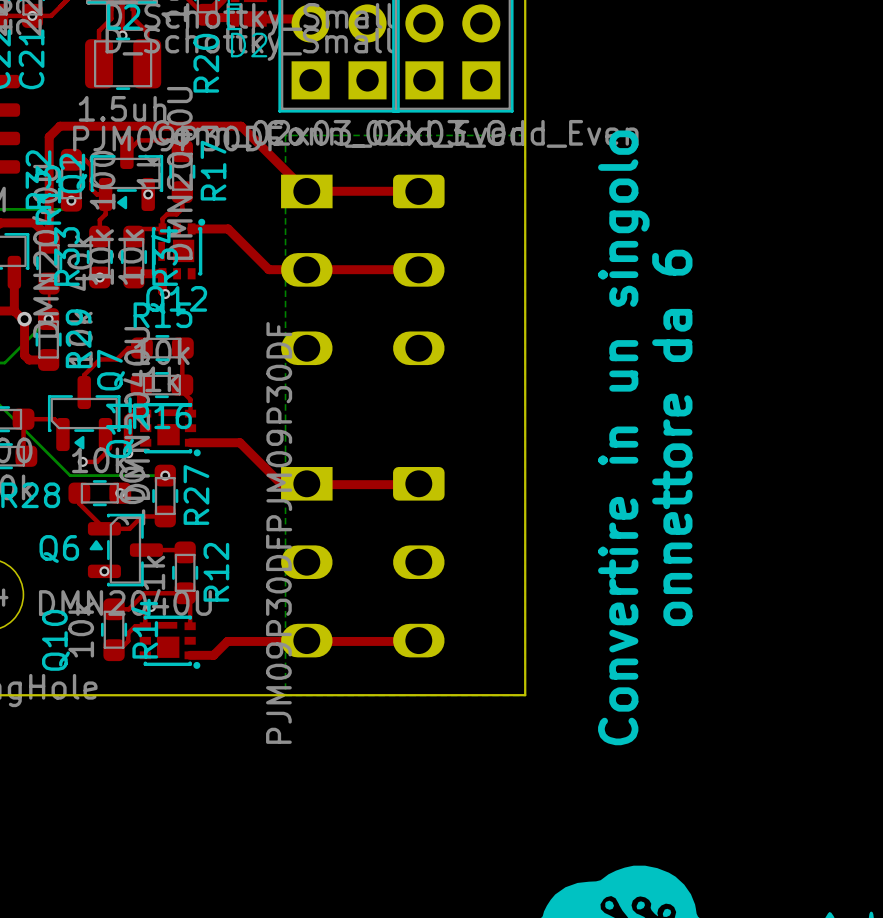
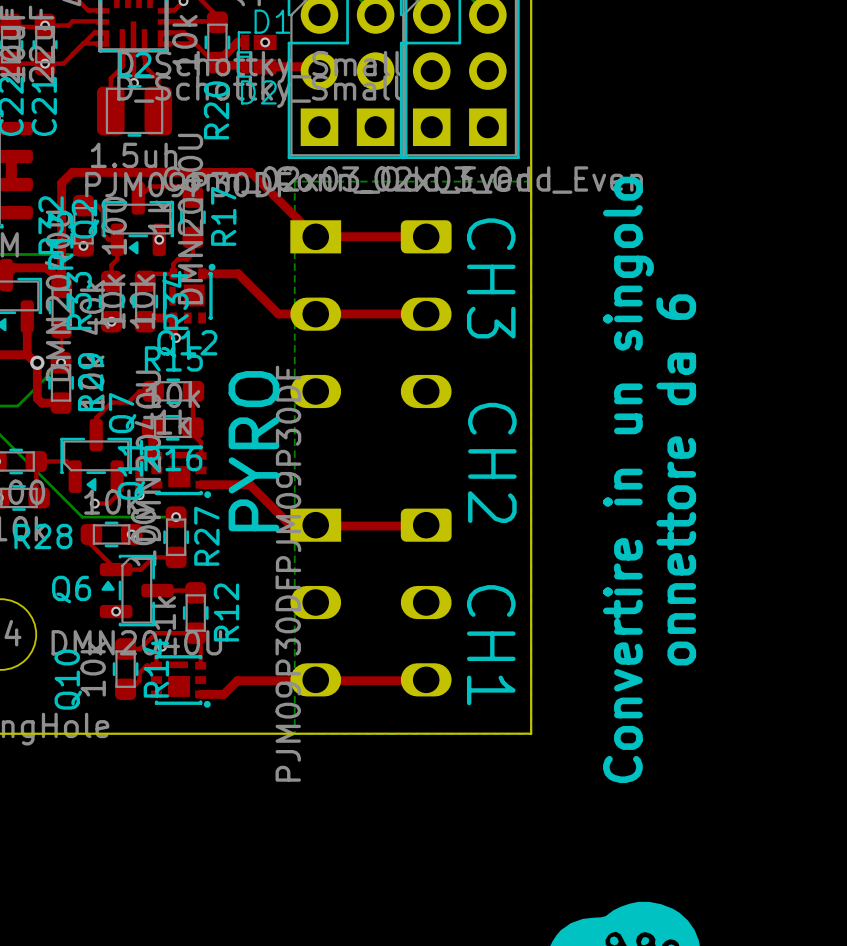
text: none -> CH3 (491, 278)
text: none -> PYRO (253, 451)
text: none -> CH2 (492, 462)
text: none -> CH1 (491, 645)

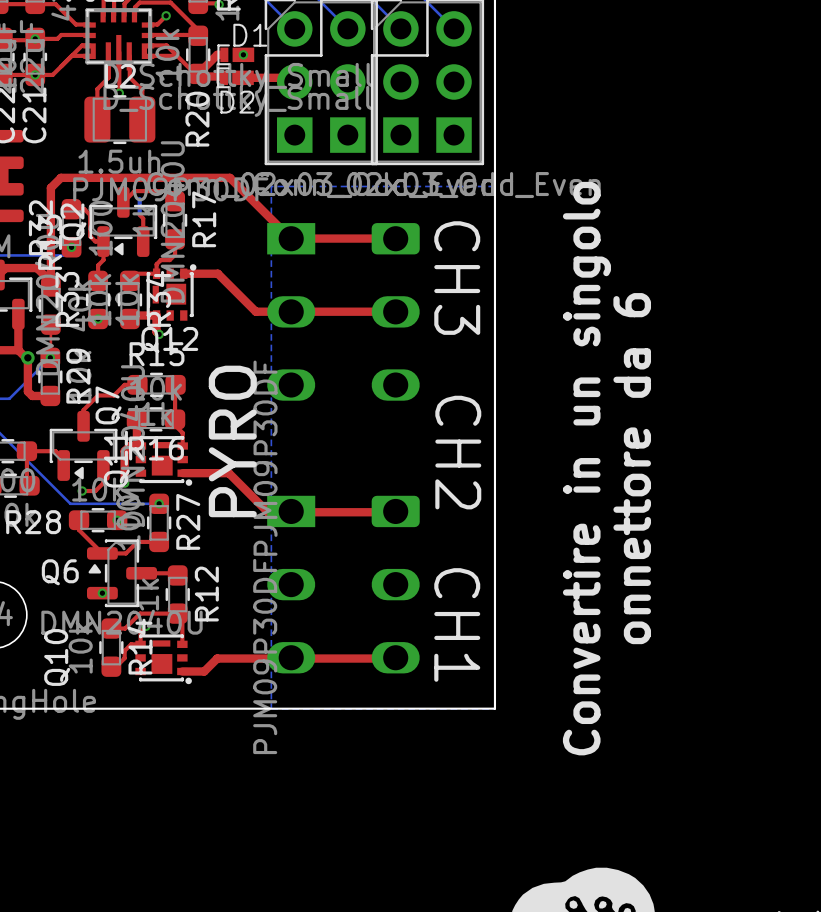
bottom track: none -> (139, 199) (139, 214)
top track: none -> (139, 214) (143, 218) (143, 241)
via: (159, 239) -> none

